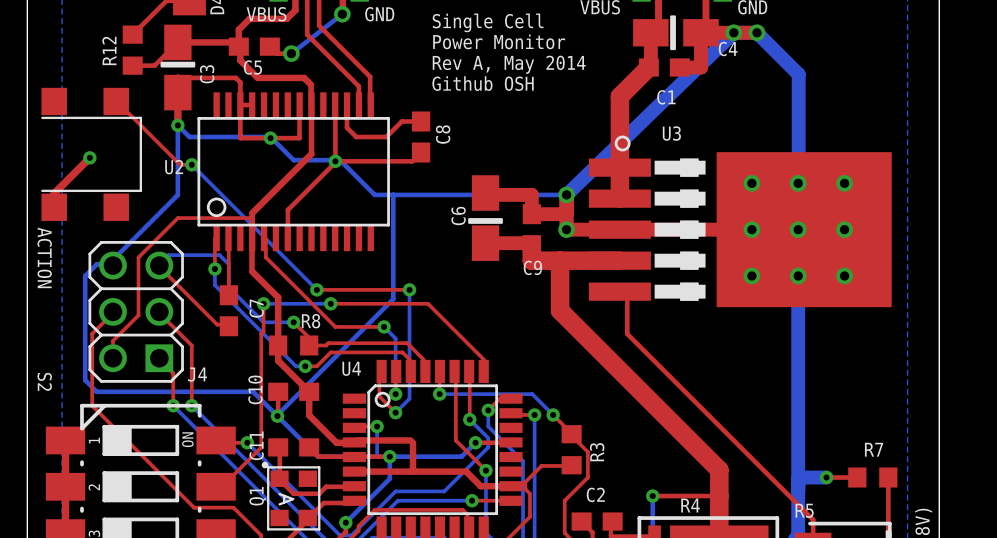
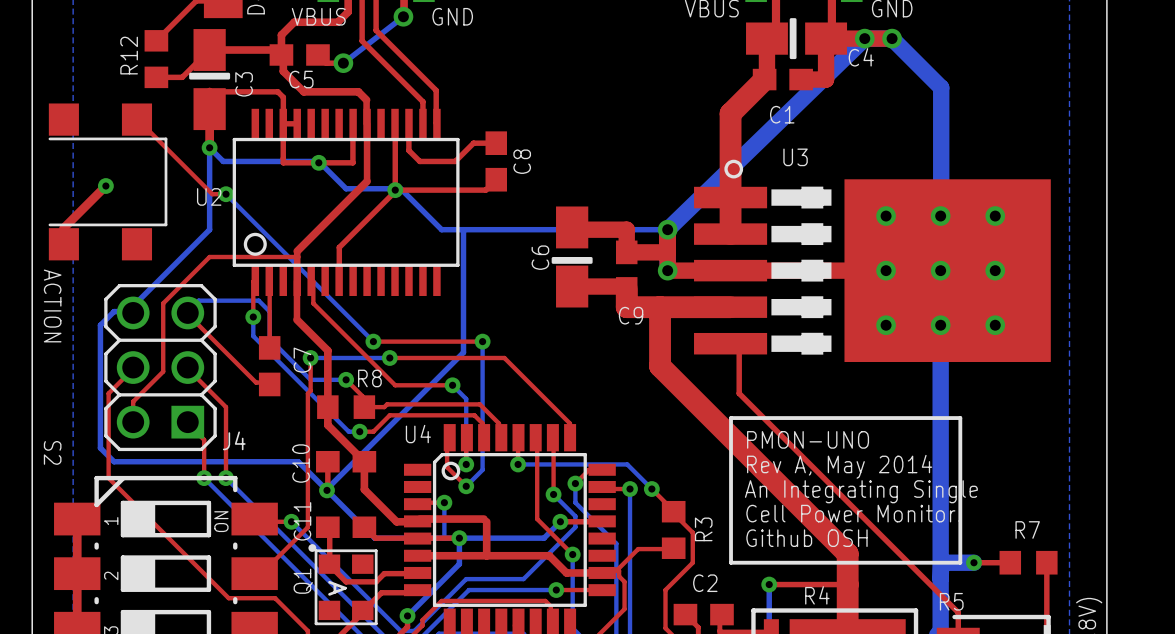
text: Single Cell (488, 22) -> none
text: Power Monitor (499, 41) -> none
text position: Rev A, May 2014 (509, 64) -> Rev A, May 2014 (839, 466)
text position: Github OSH (483, 83) -> Github OSH (806, 538)
line: none -> (731, 418) (960, 418) (960, 562) (731, 562) (731, 418)
text: none -> PMON-UNO (808, 439)
text: none -> An Integrating Single (861, 491)
text: none -> Cell Power Monitor. (853, 513)

